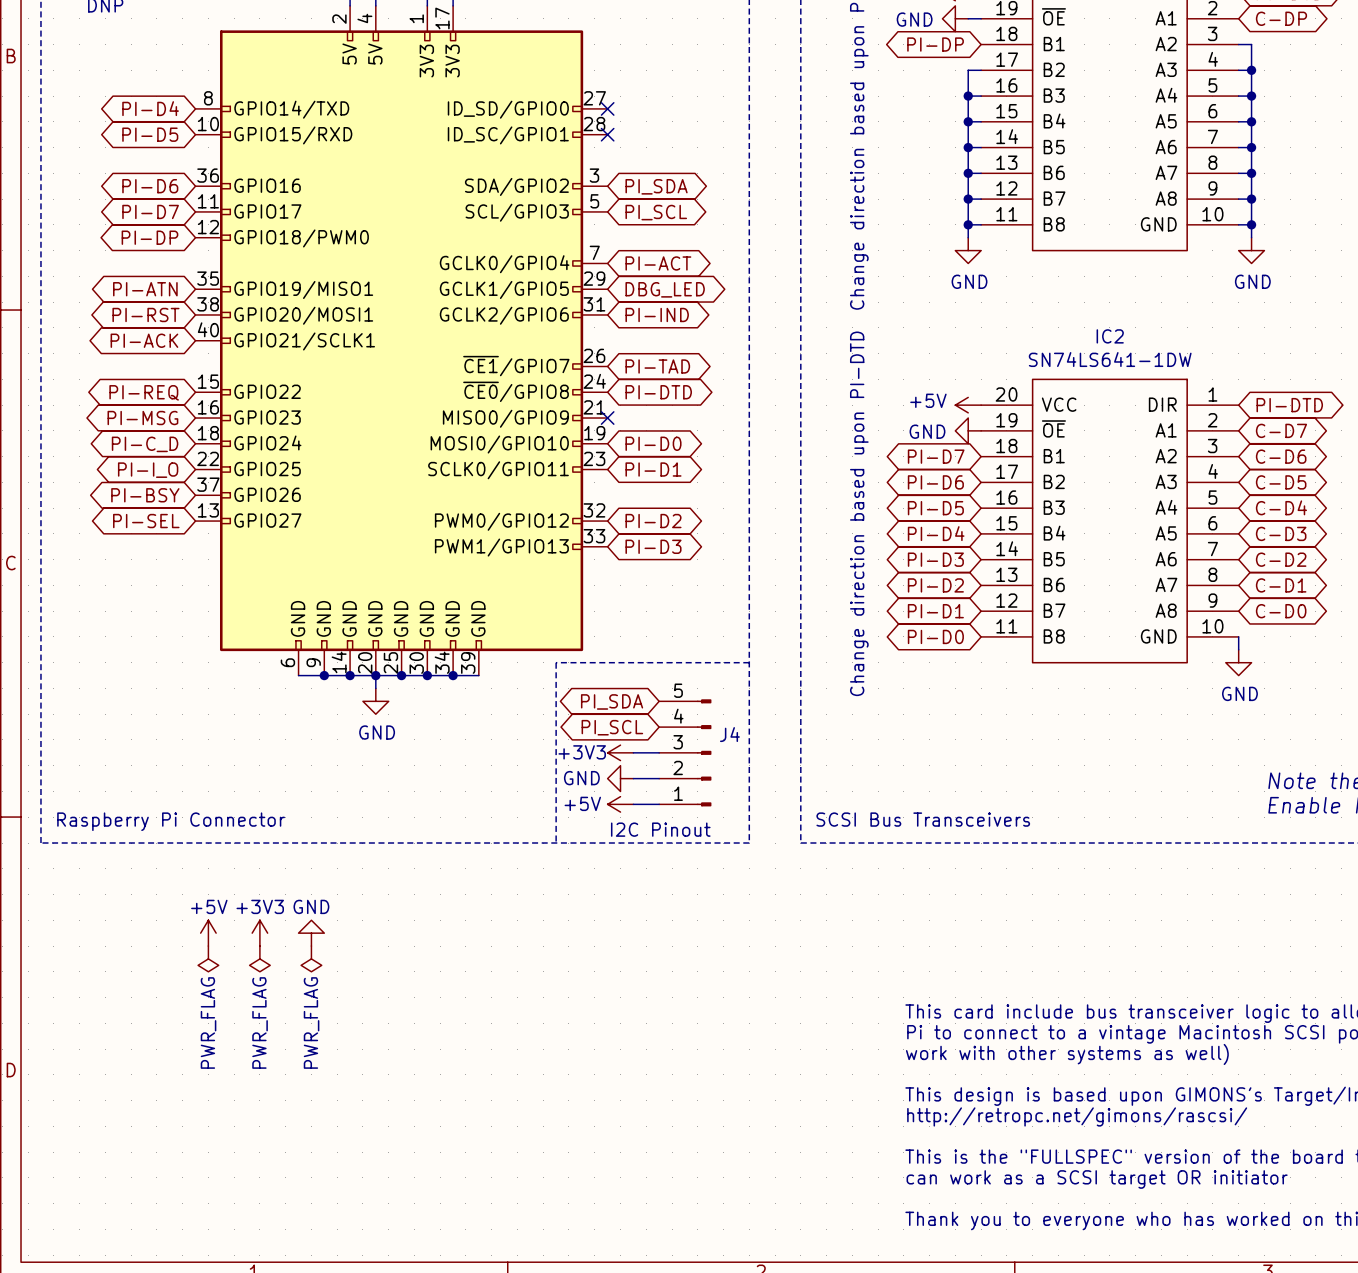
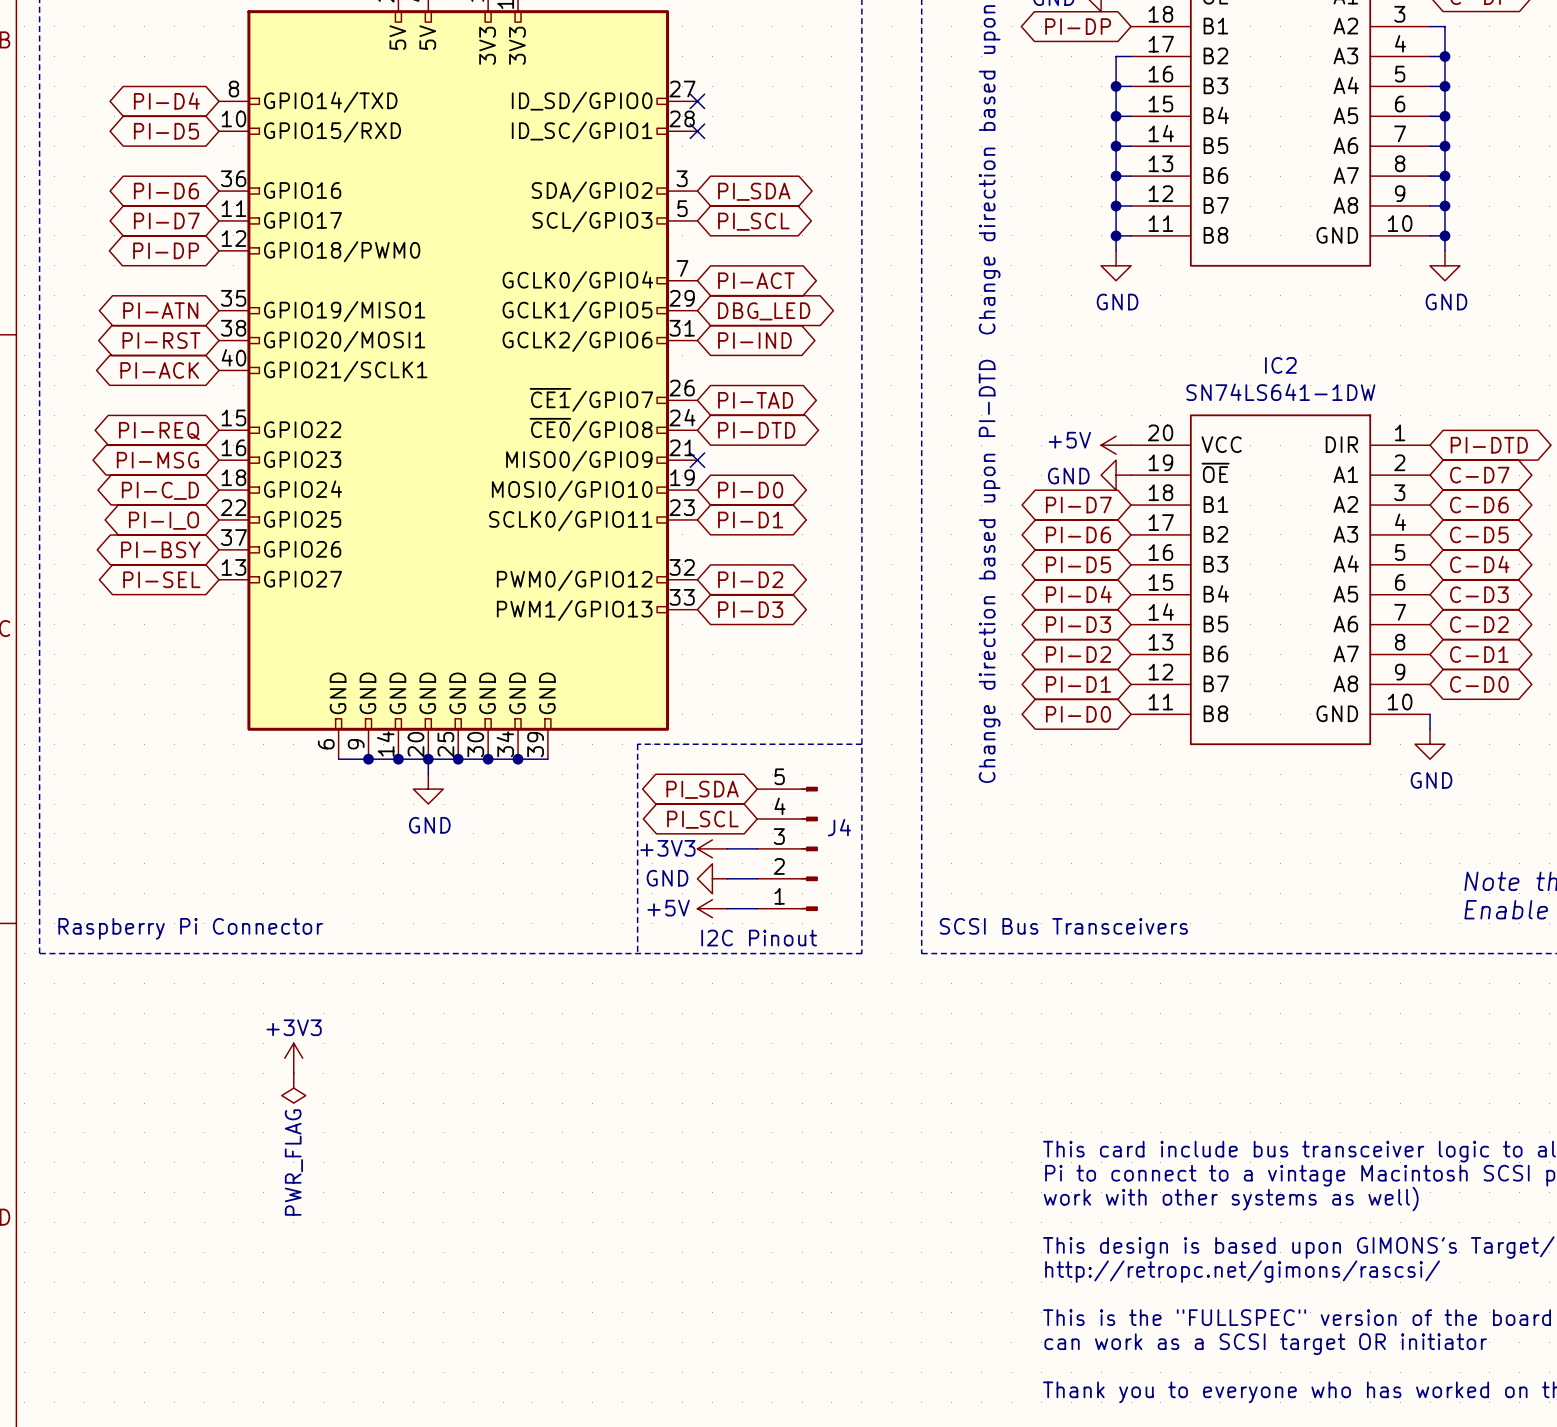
power symbol: +5V (208, 933) -> none
power symbol: GND (311, 933) -> none
power symbol: PWR_FLAG (208, 958) -> none
power symbol: PWR_FLAG (311, 958) -> none

